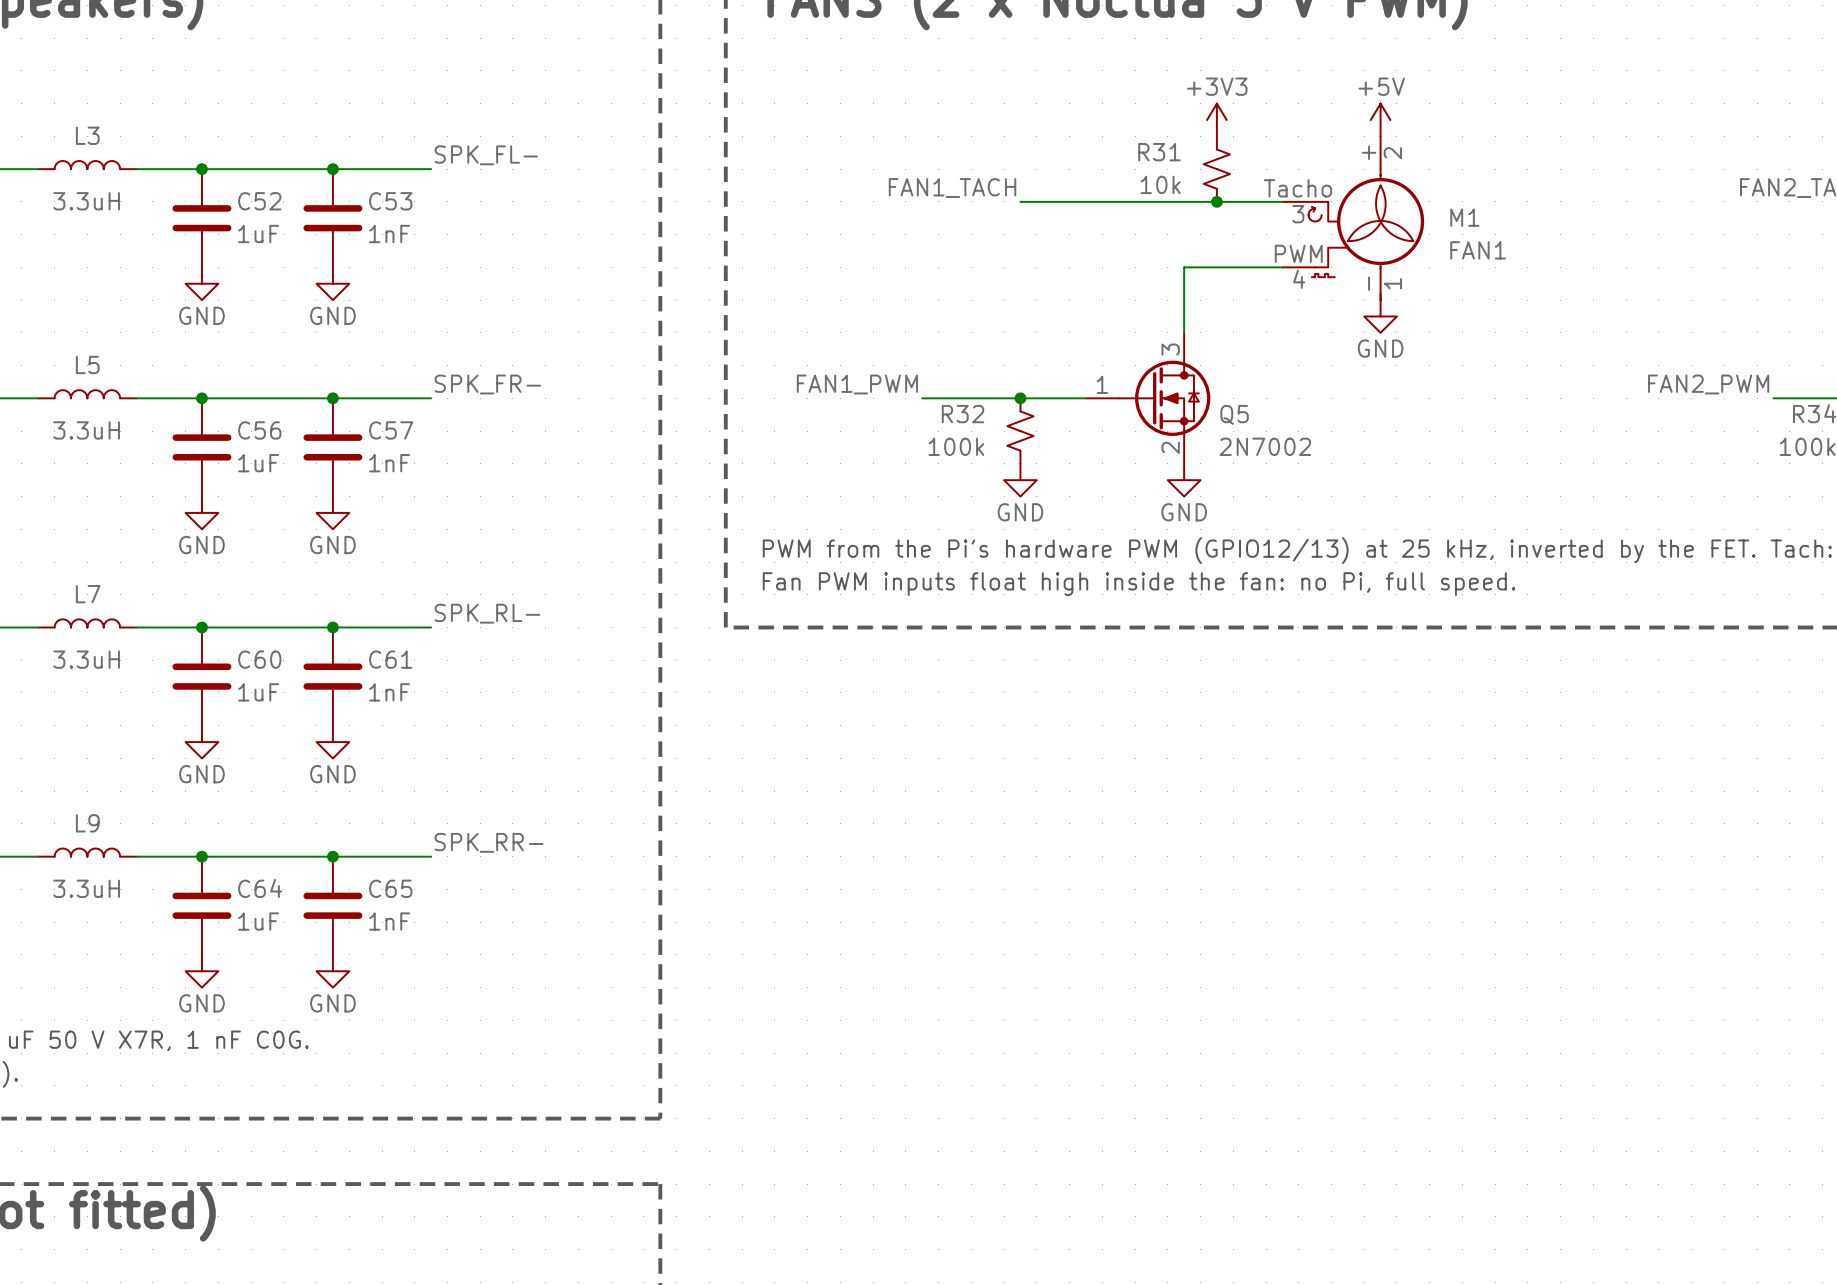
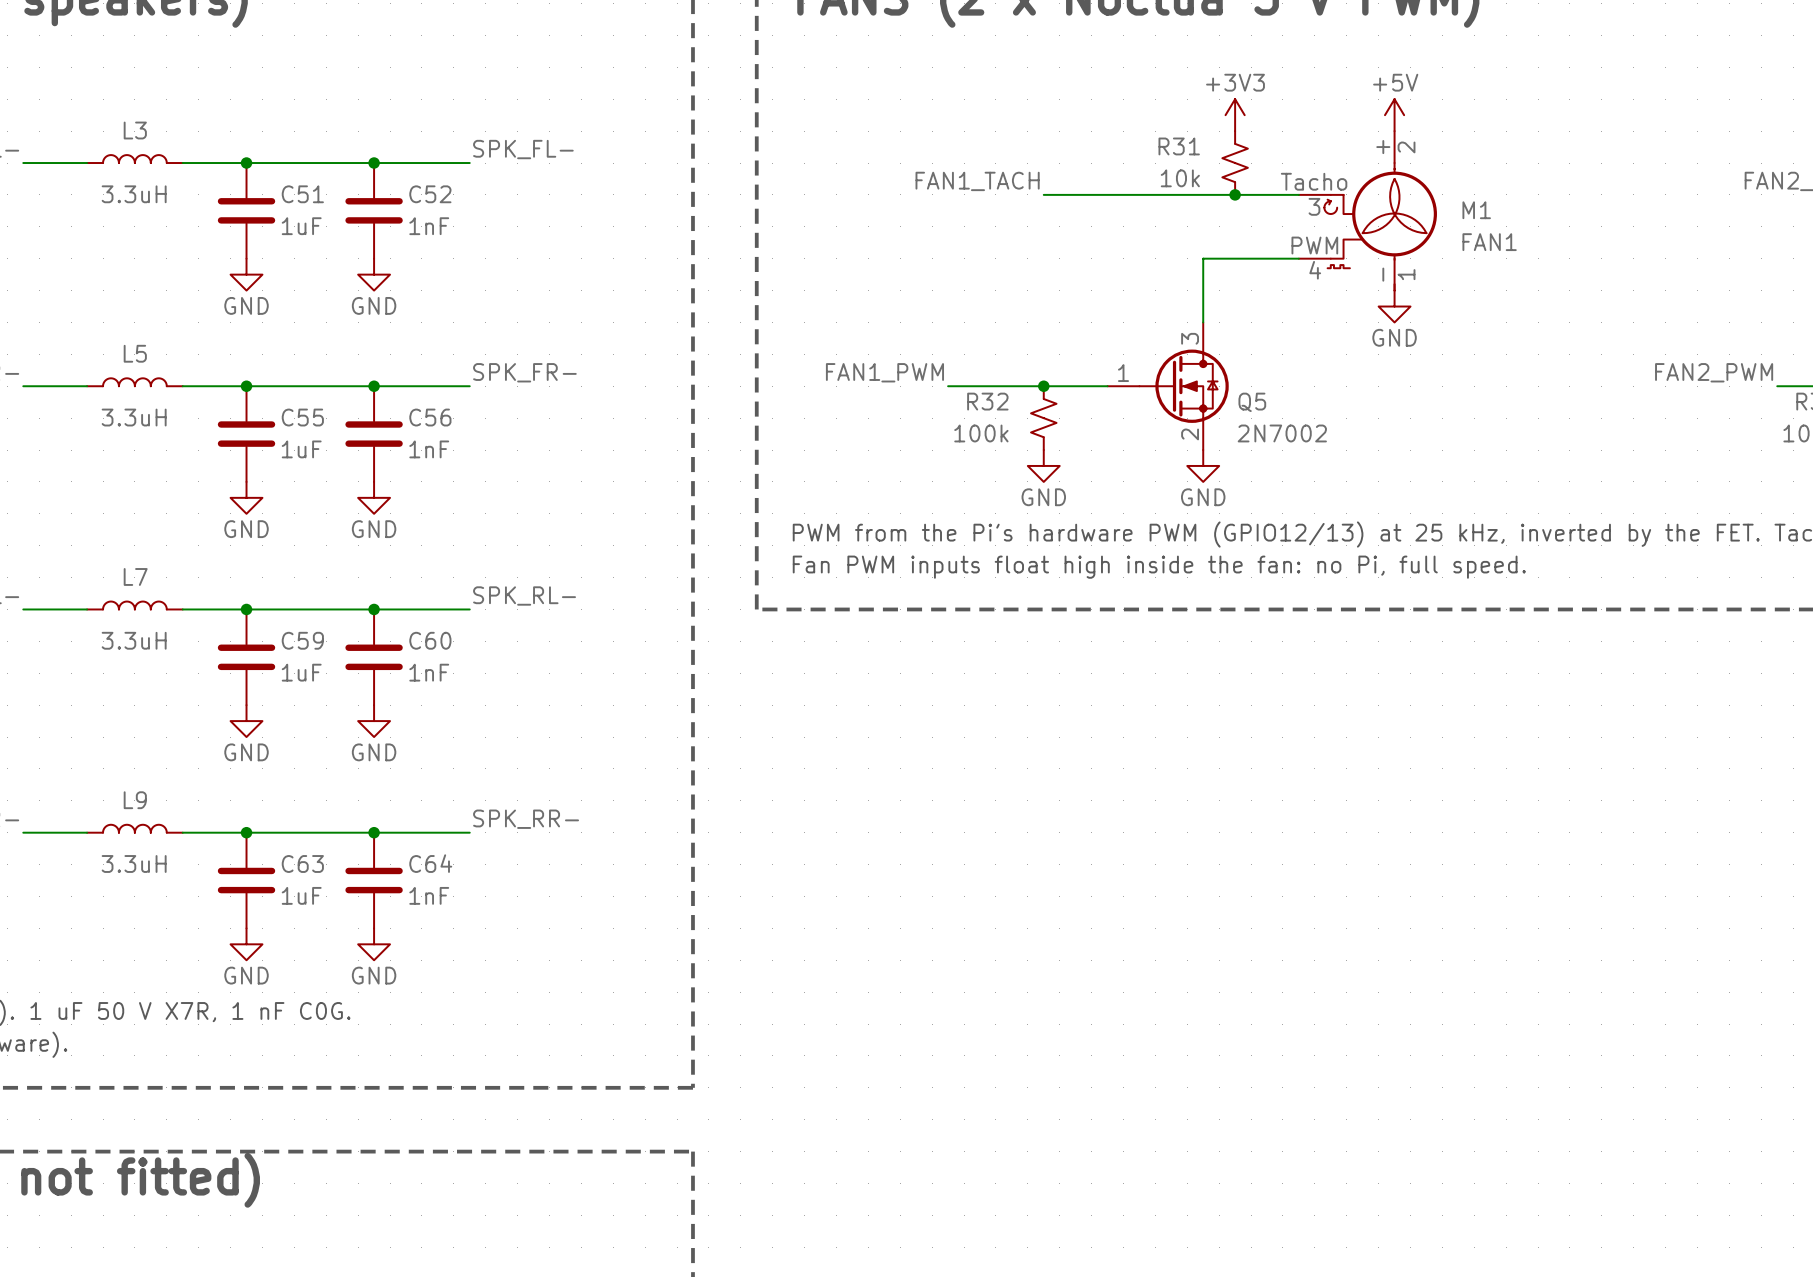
C52 name: C52 (259, 201) -> C51 (302, 194)
C53 name: C53 (390, 201) -> C52 (430, 194)
C56 name: C56 (259, 430) -> C55 (302, 417)
C57 name: C57 (391, 430) -> C56 (430, 417)
C60 name: C60 (259, 659) -> C59 (302, 640)
C61 name: C61 (390, 659) -> C60 (430, 640)
C64 name: C64 (260, 888) -> C63 (302, 863)
C65 name: C65 (390, 888) -> C64 (430, 863)

